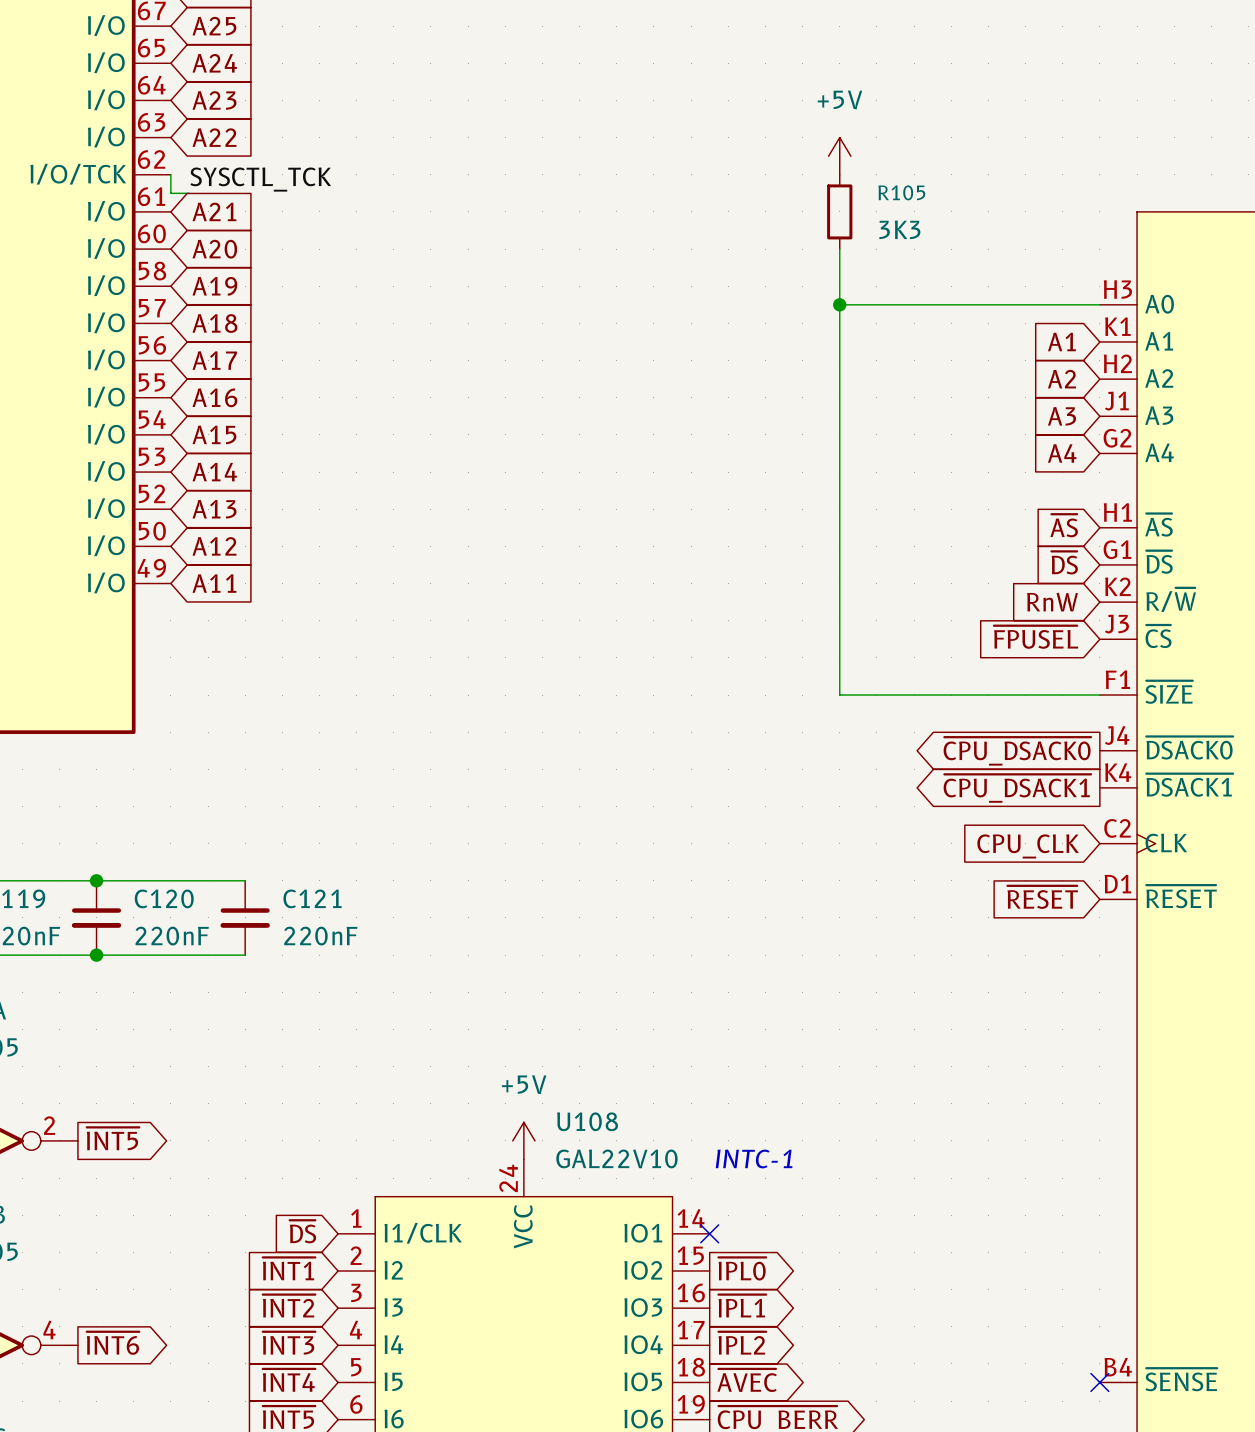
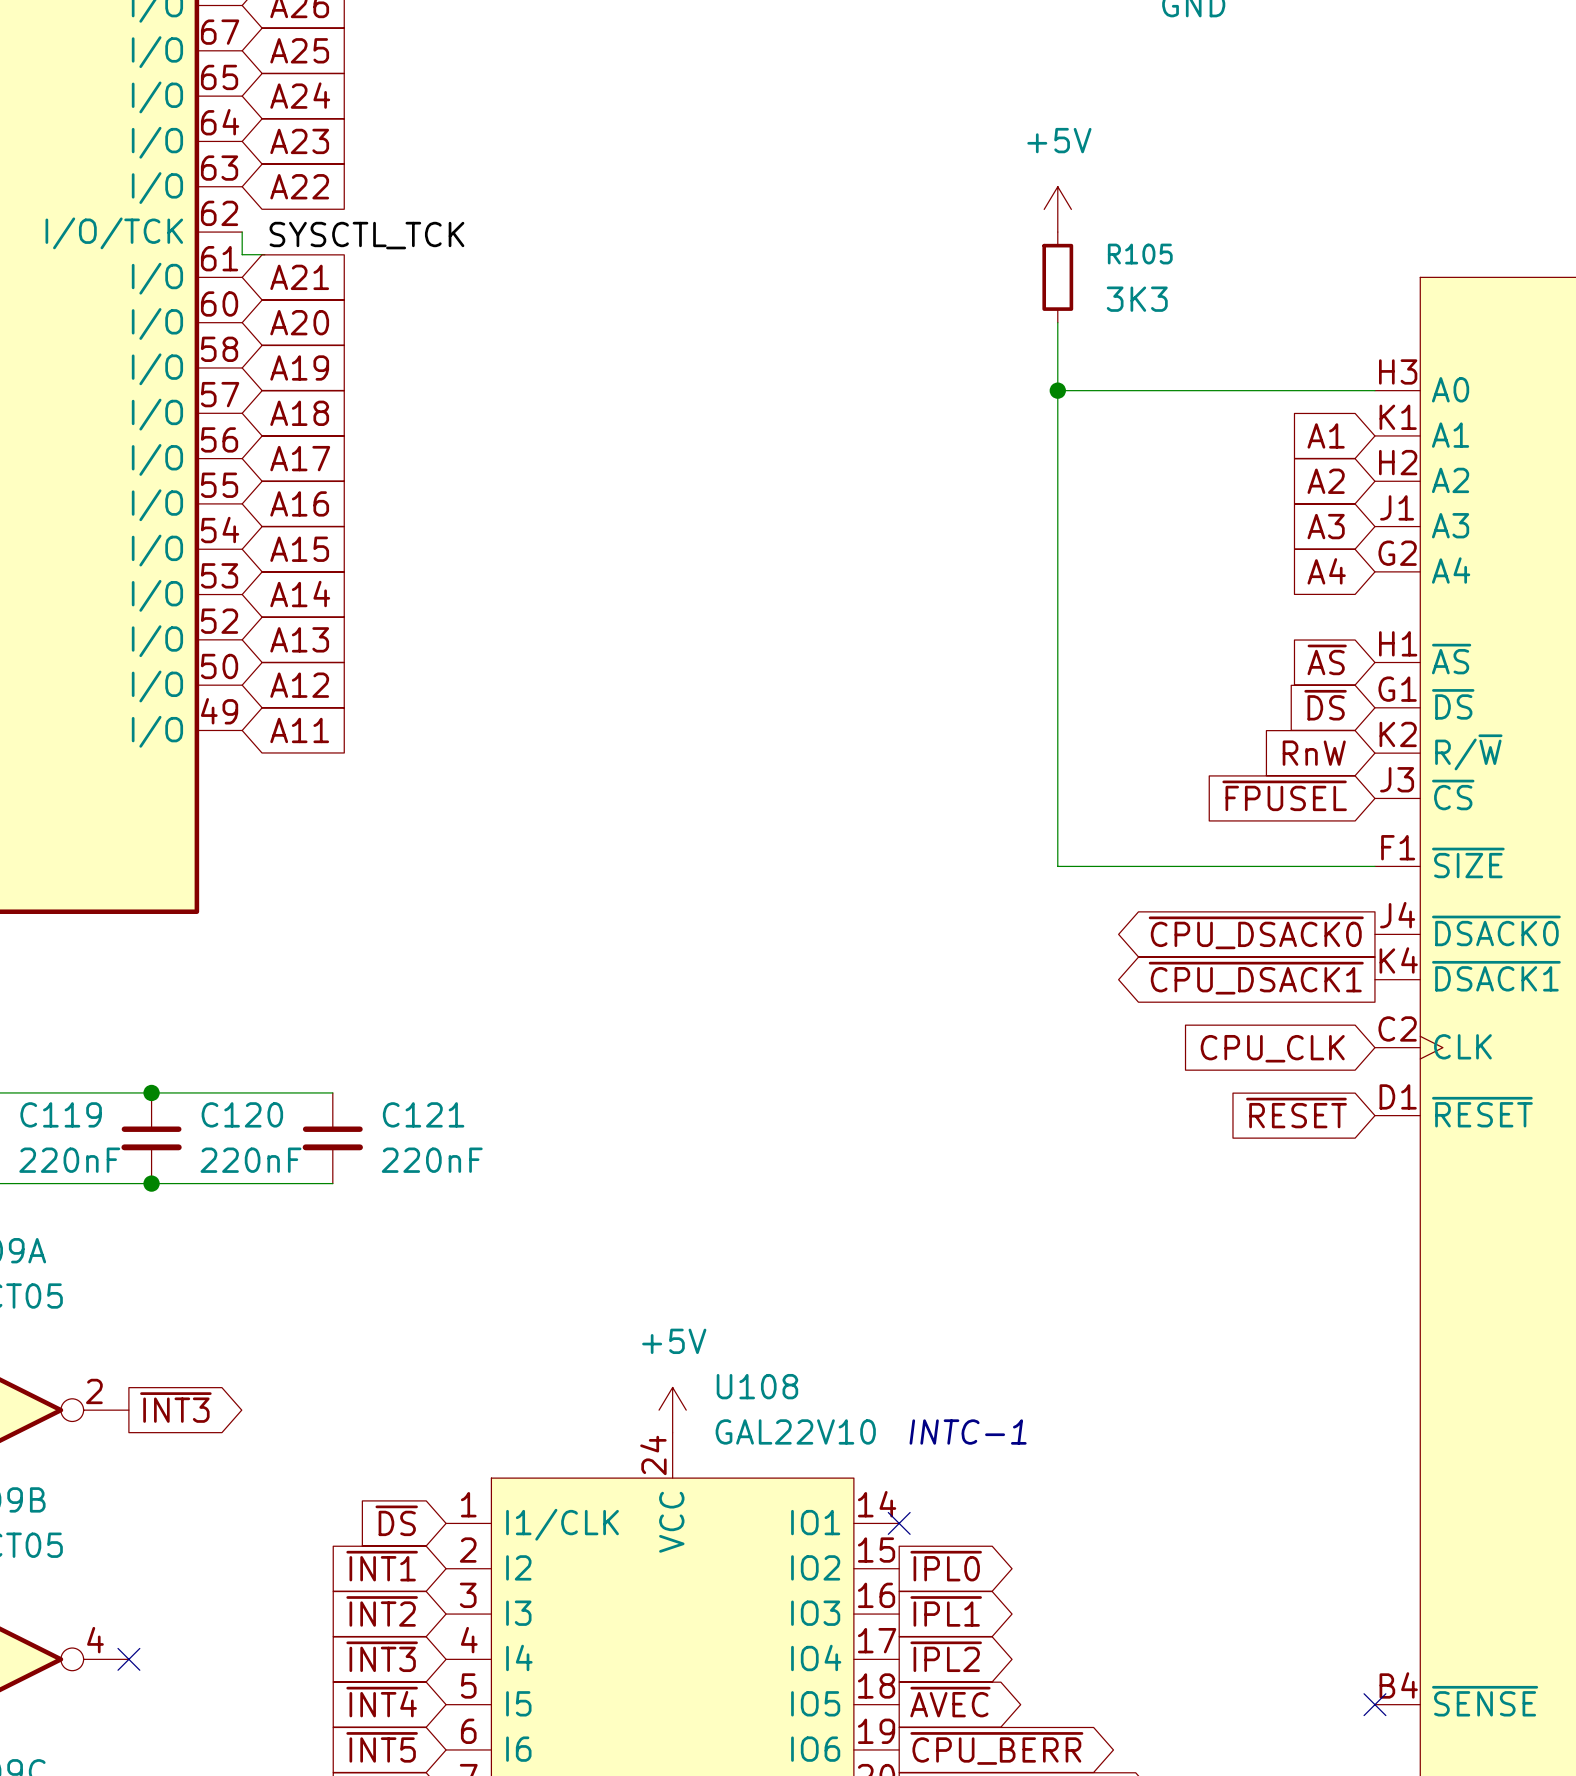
global label: ~{INT5} (113, 1138) -> ~{INT3} (175, 1407)
global label: ~{INT6} (113, 1343) -> none
no-connect mark: none -> (128, 1659)

